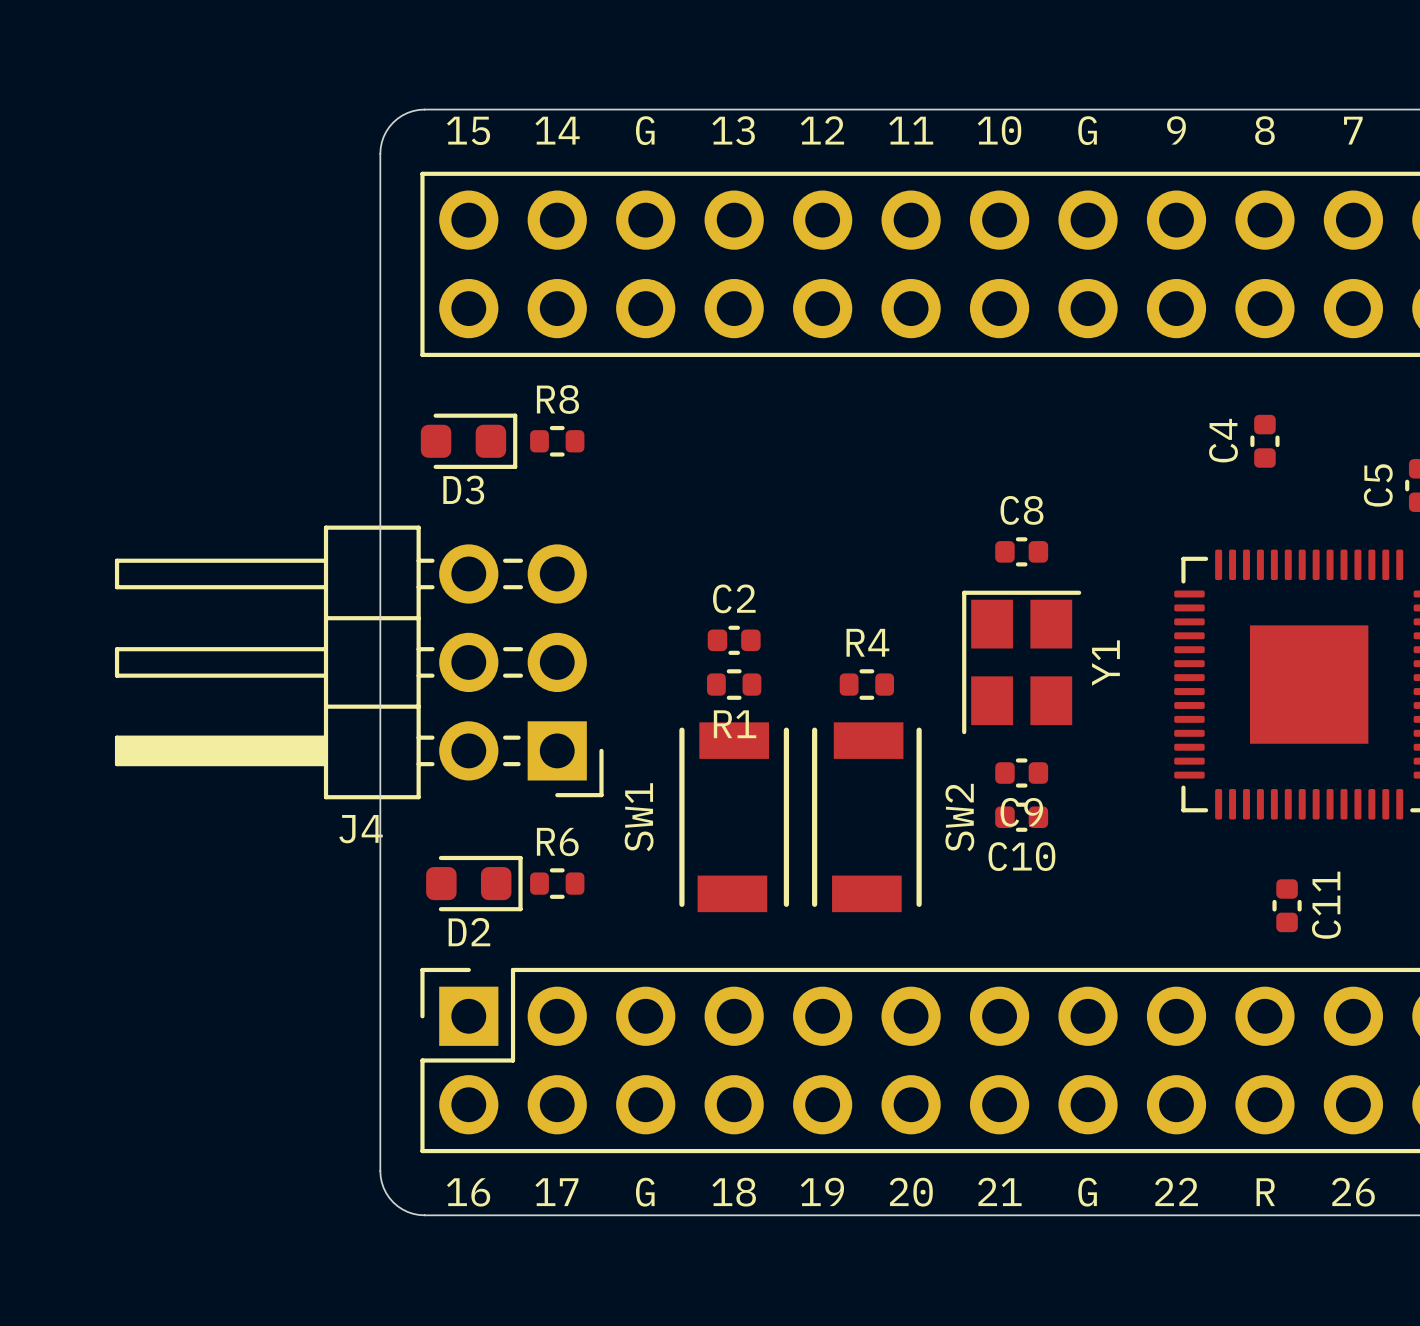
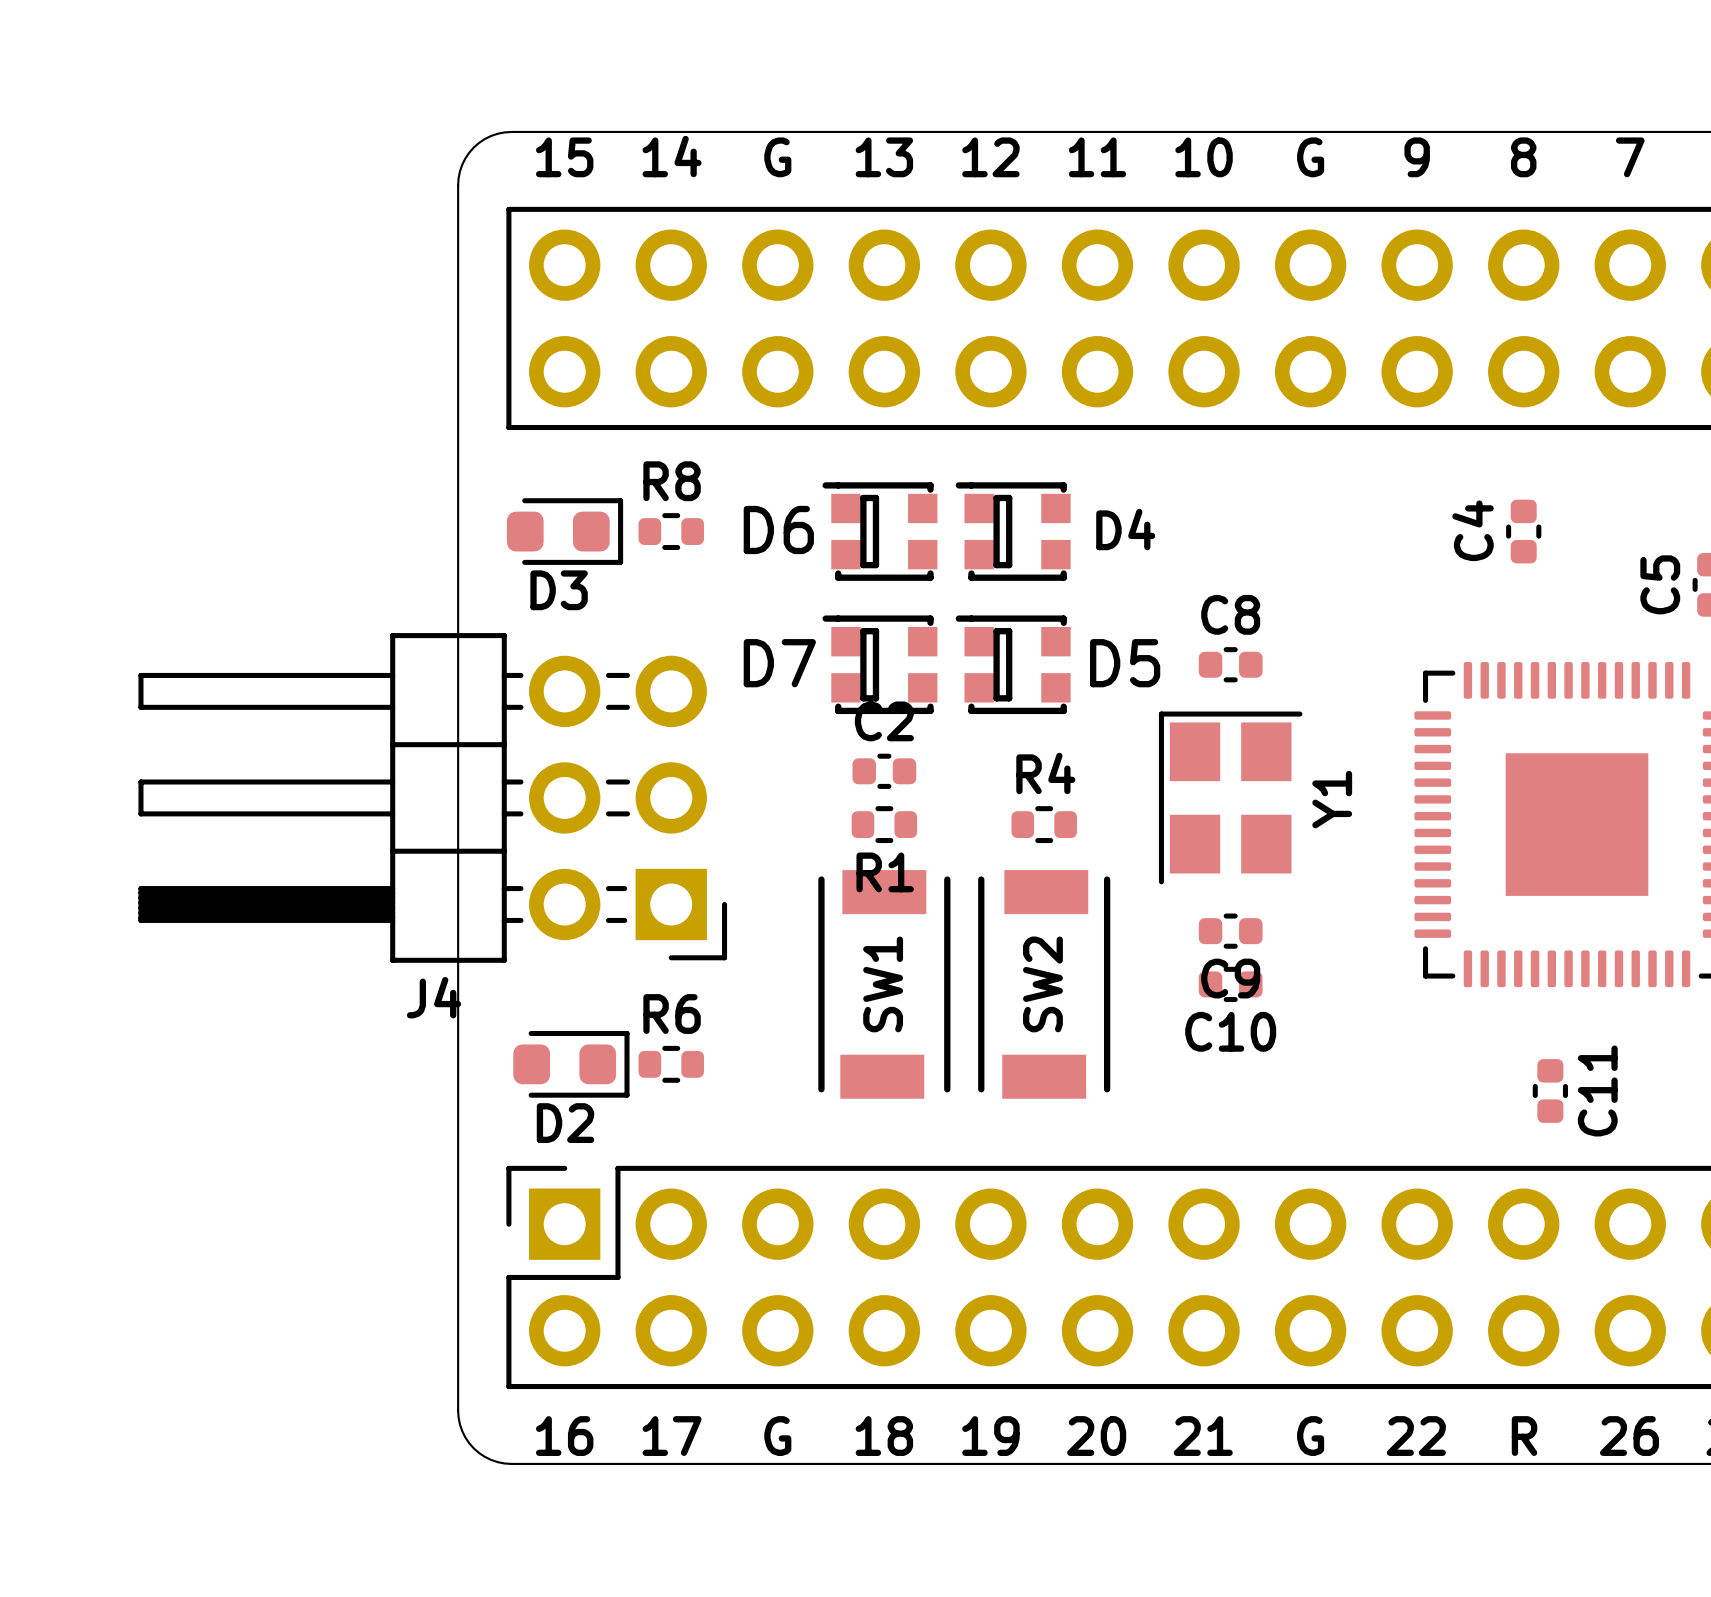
D6: none -> (879, 531)
D4: none -> (1013, 531)
D7: none -> (879, 664)
D5: none -> (1013, 664)
SW1 name position: SW1 (639, 817) -> SW1 (883, 984)
SW2 name position: SW2 (959, 817) -> SW2 (1042, 984)

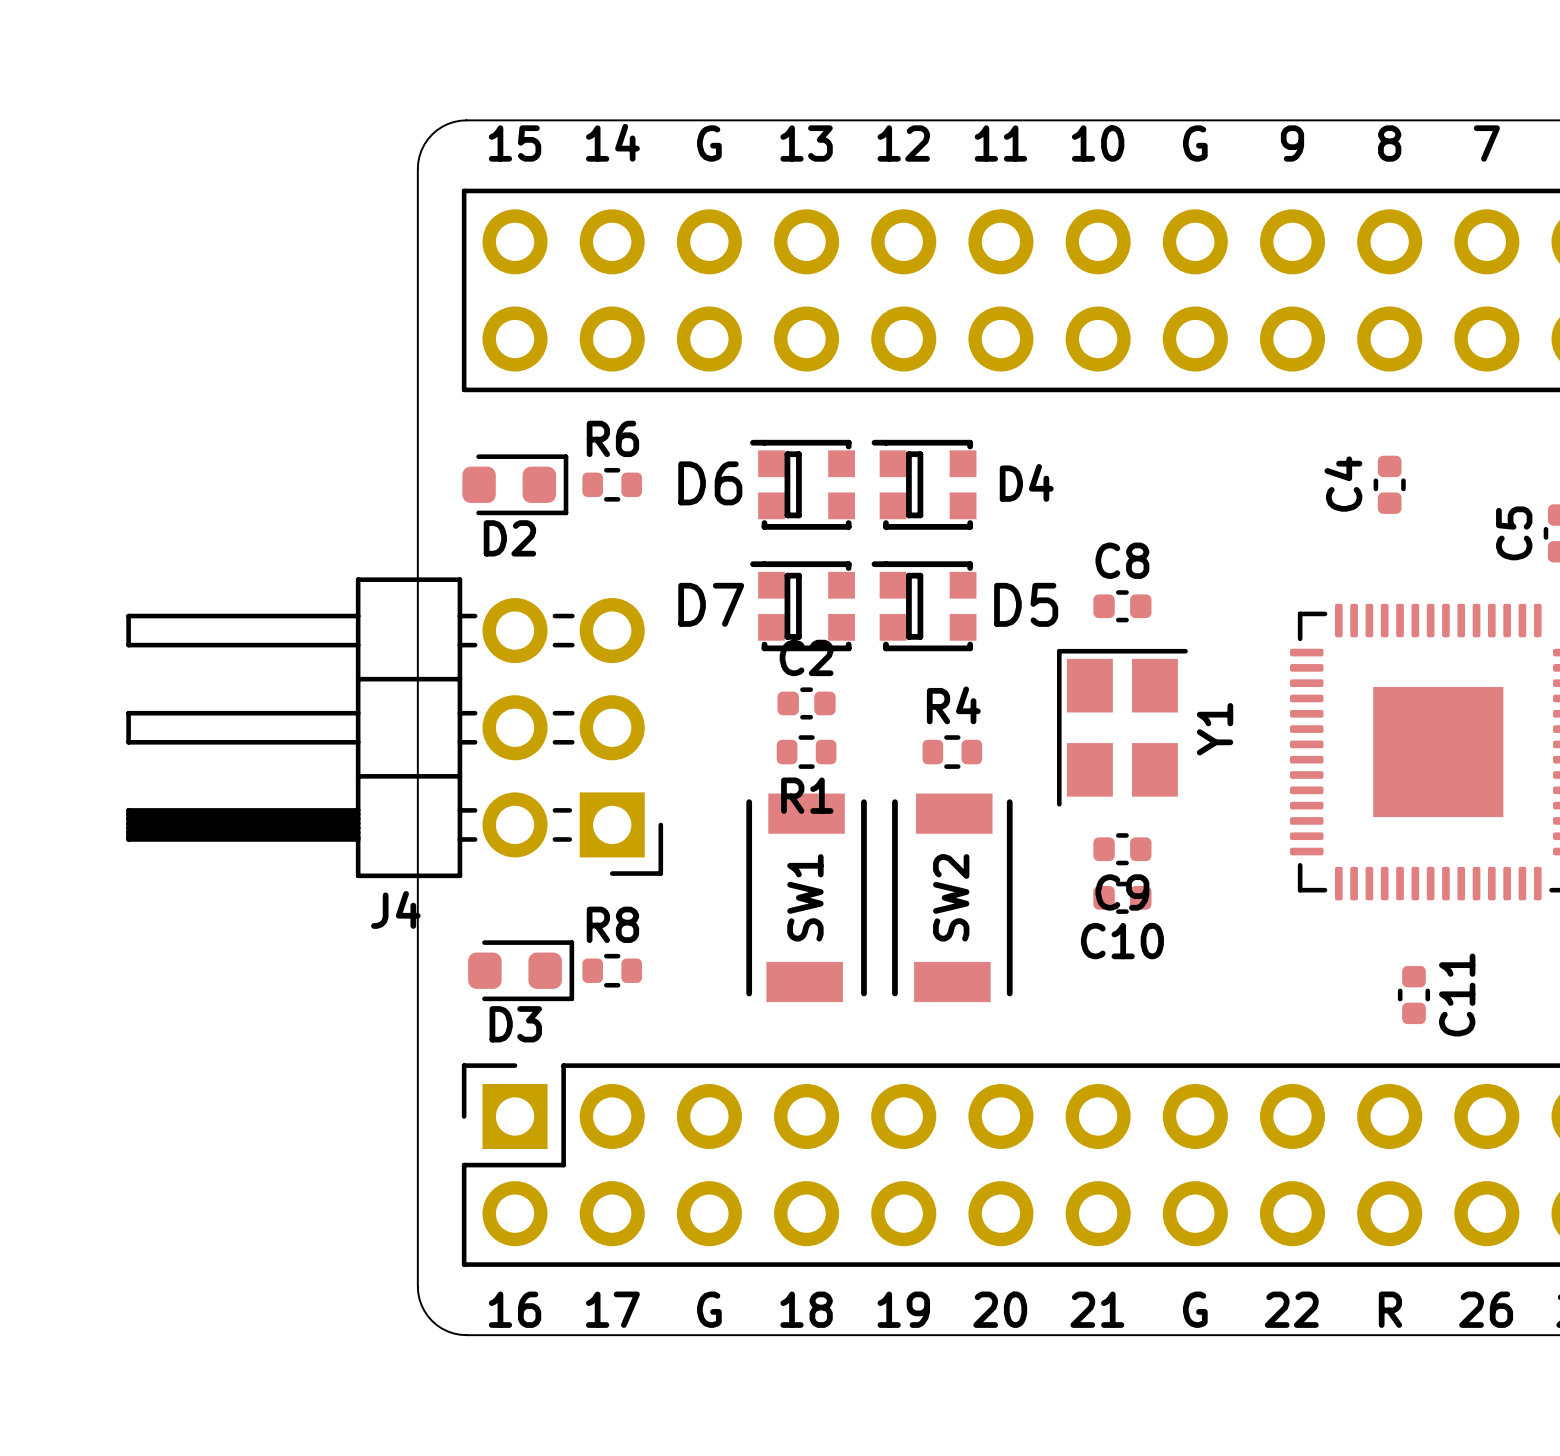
R8 name: R8 (672, 481) -> R6 (612, 438)
D3 name: D3 (559, 590) -> D2 (509, 538)
R6 name: R6 (672, 1014) -> R8 (612, 924)
D2 name: D2 (565, 1123) -> D3 (515, 1024)

